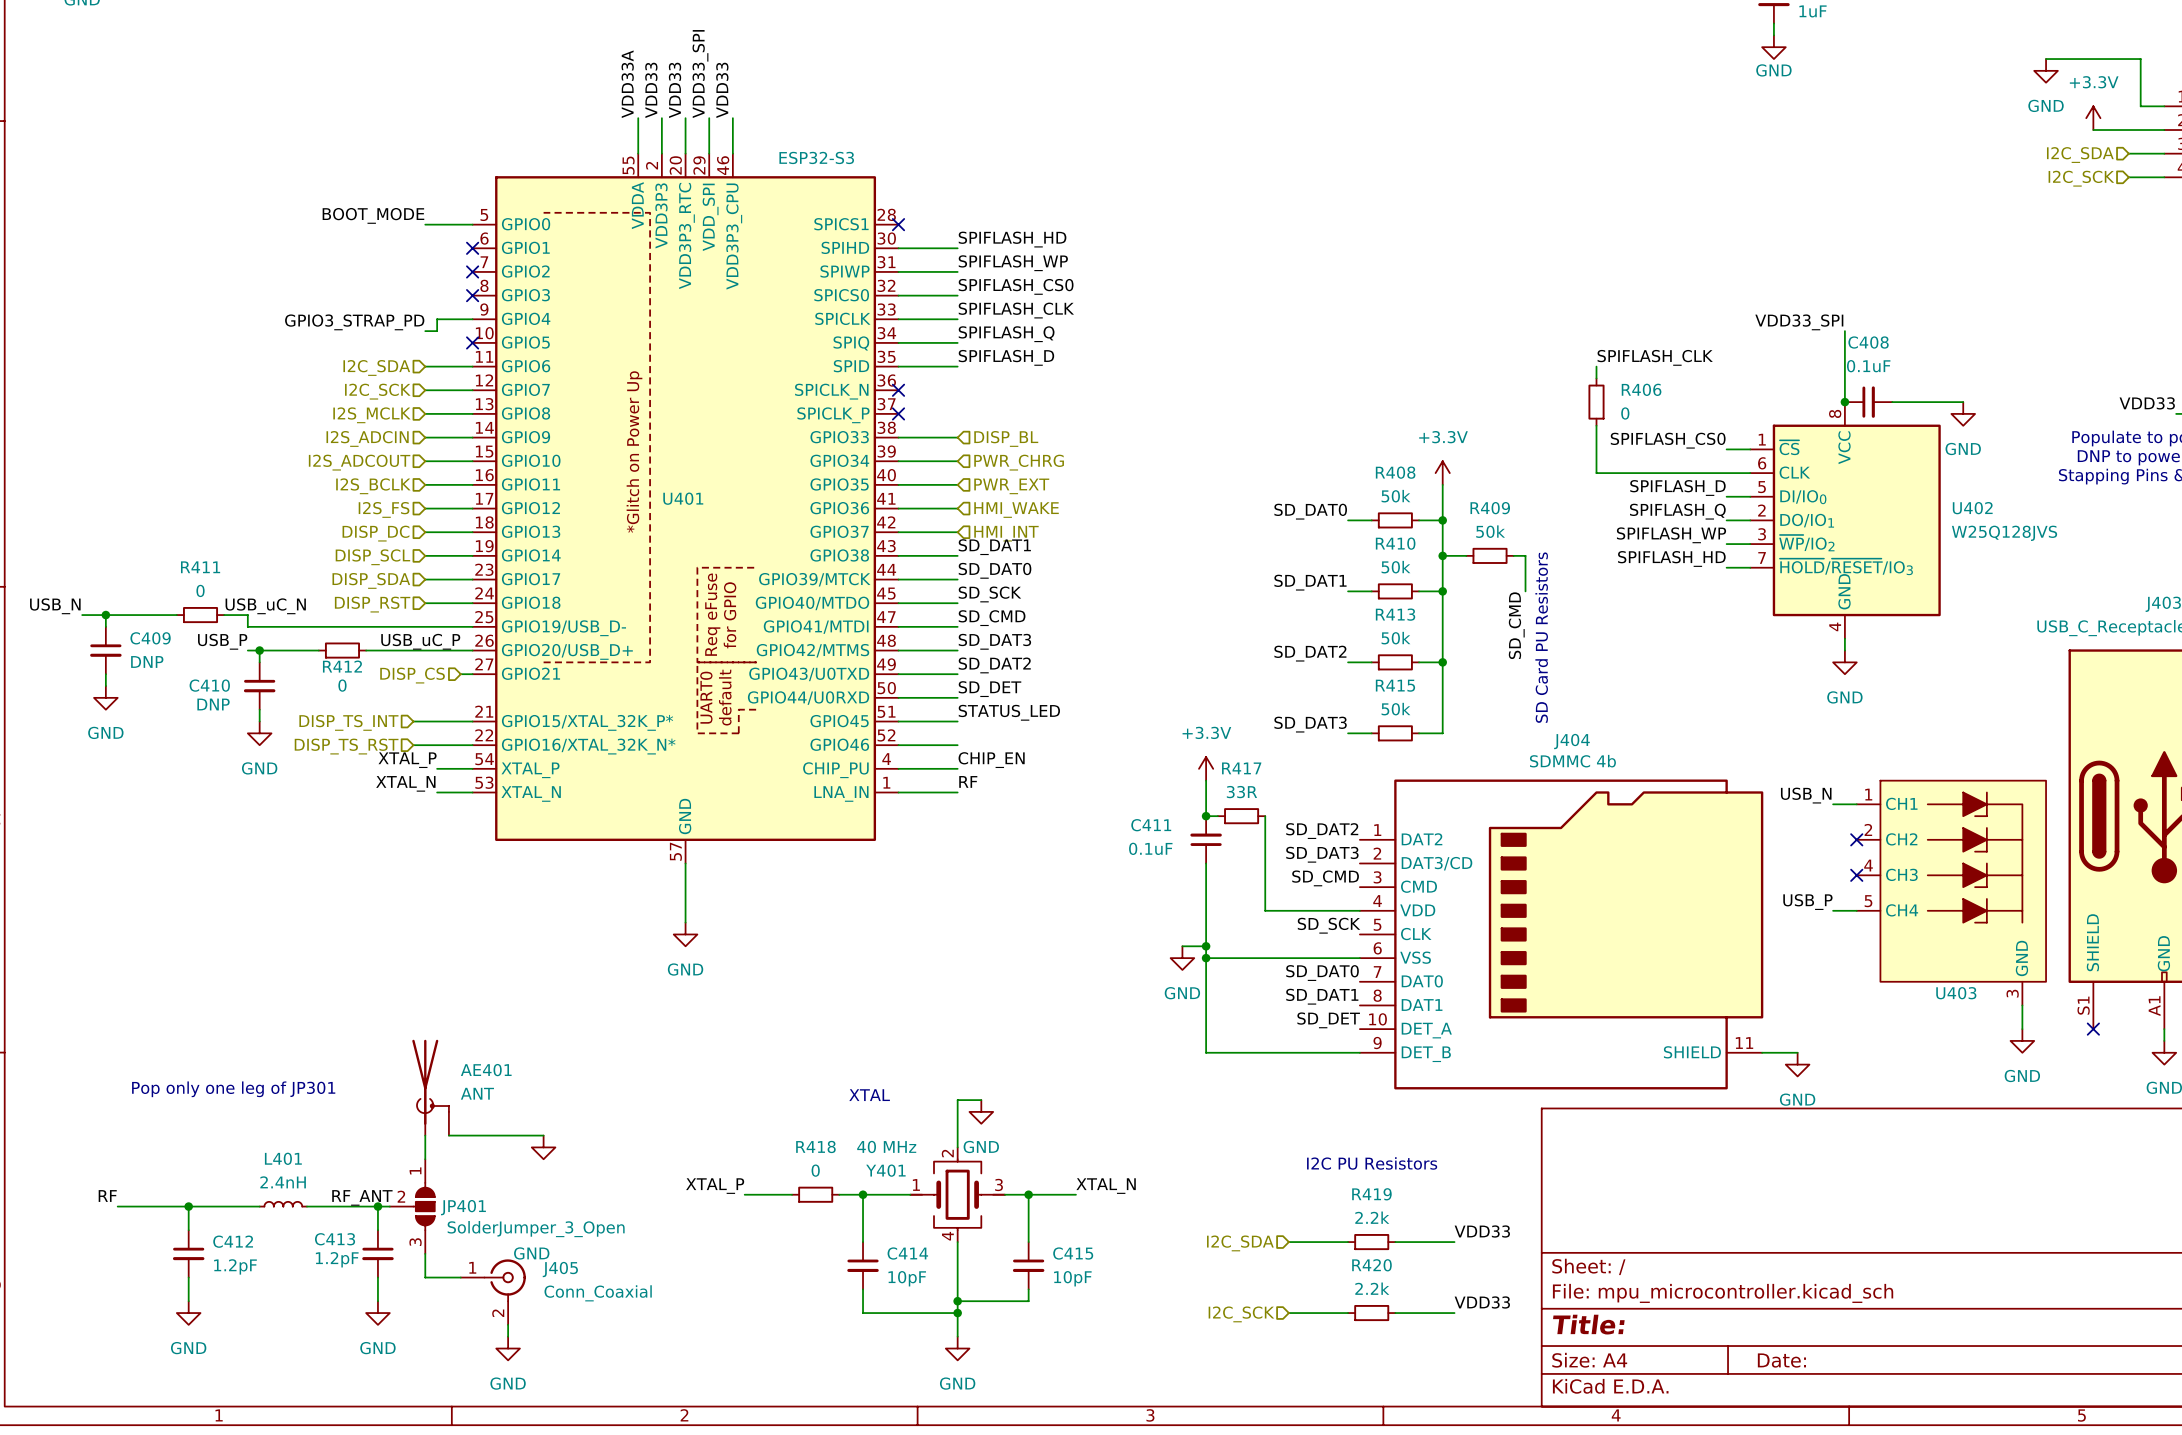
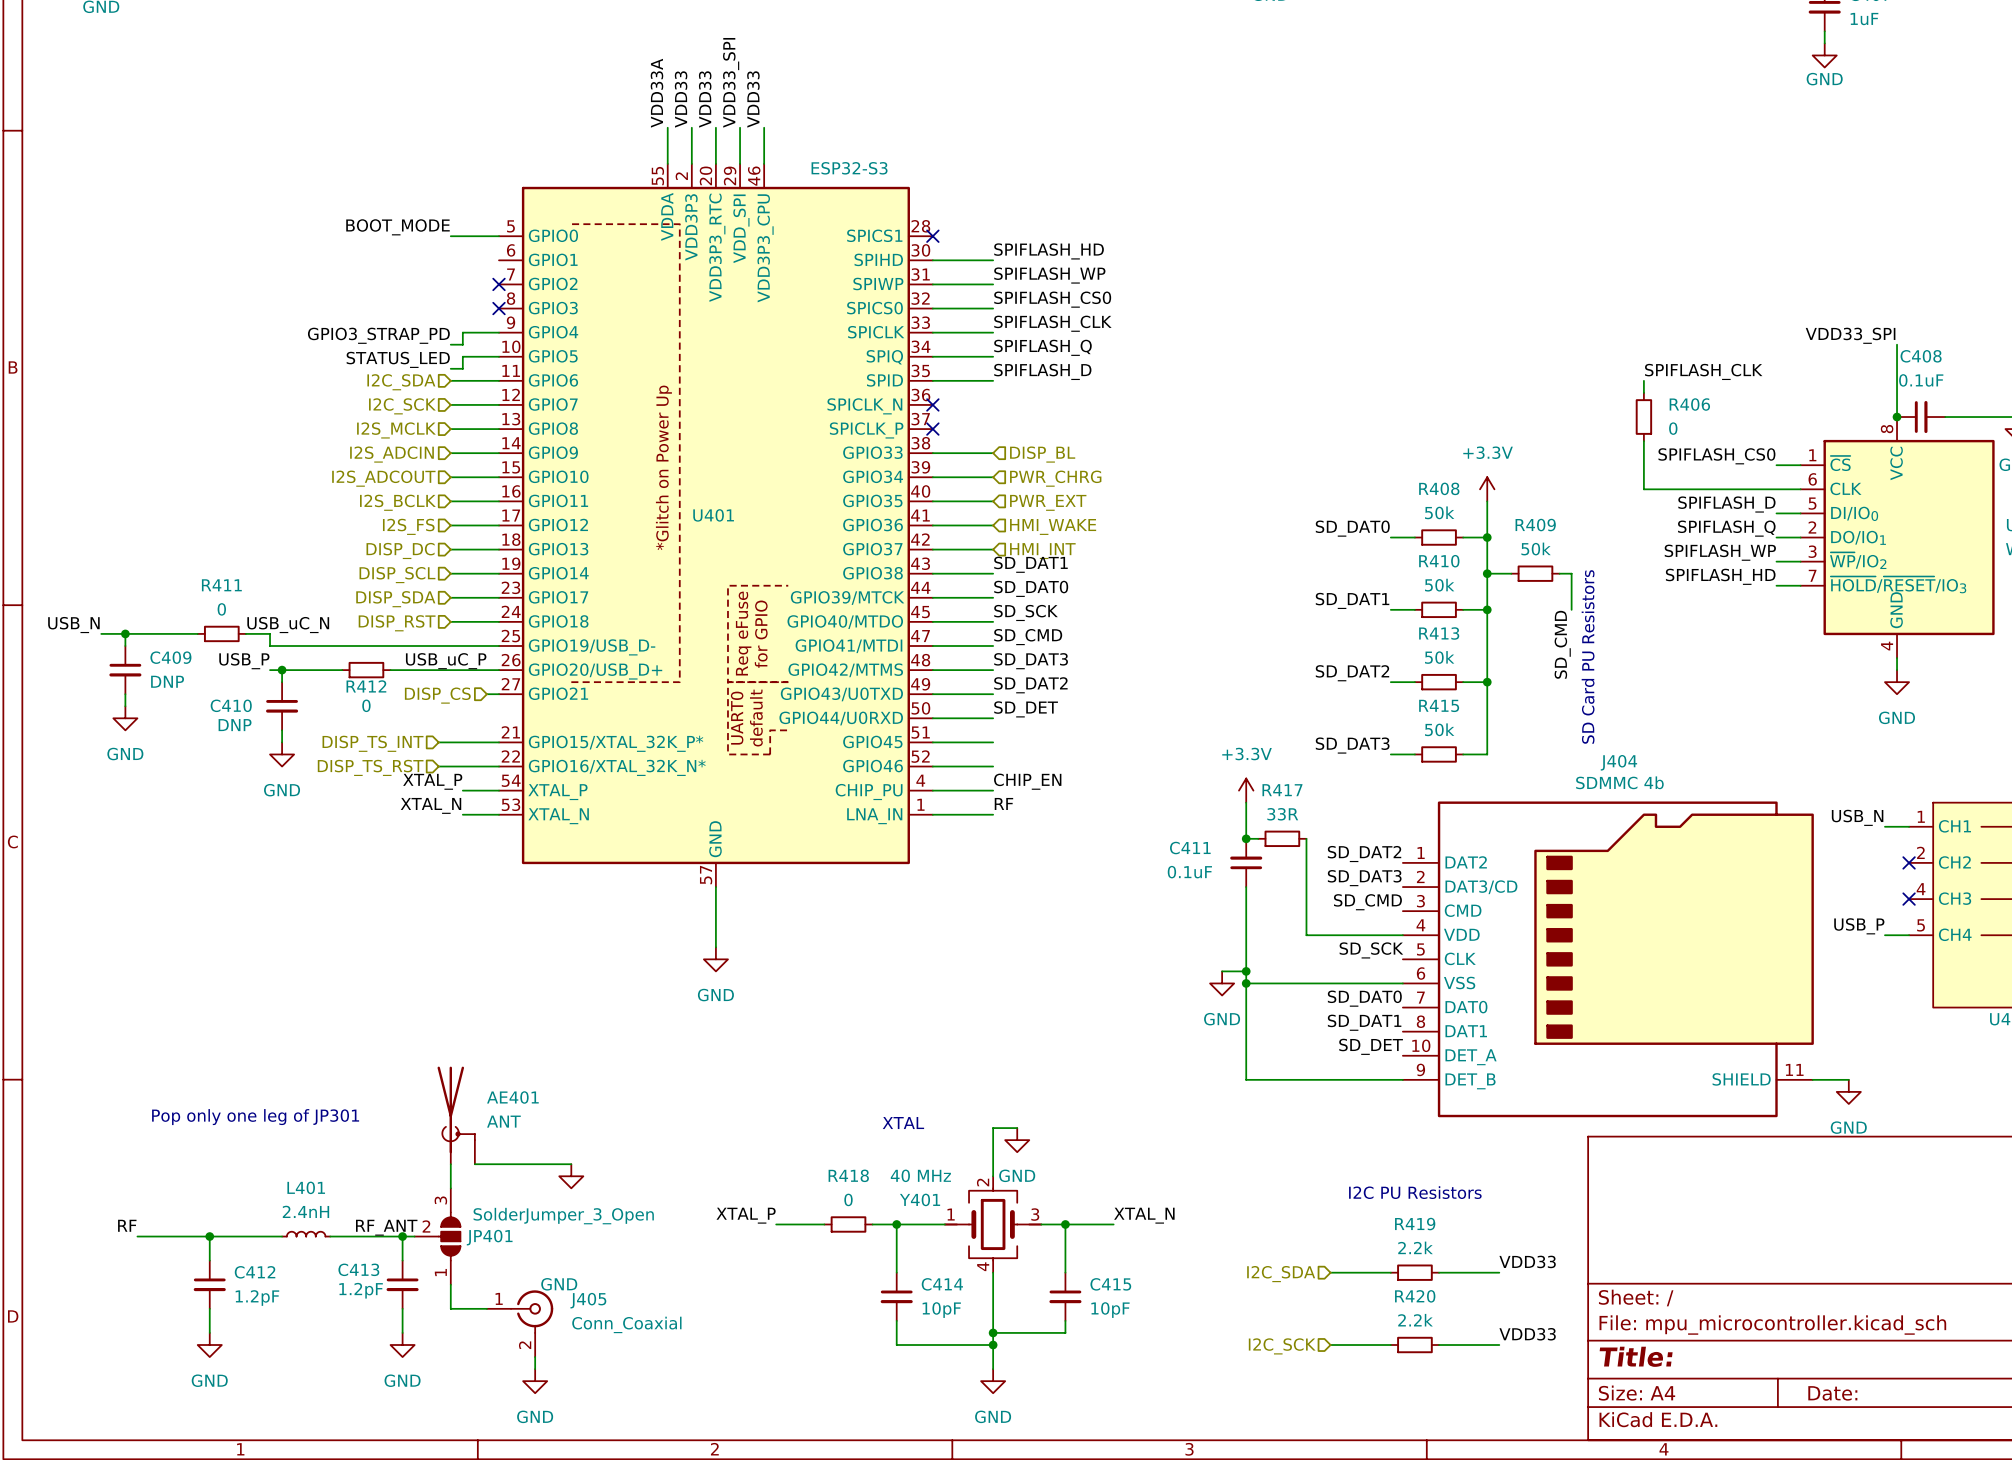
no-connect mark: (472, 248) -> none
wire: none -> (499, 356) (462, 356) (462, 368) (450, 368)
no-connect mark: (472, 342) -> none
label: none -> STATUS_LED (398, 359)
label: STATUS_LED (1009, 712) -> none
JP401 flip: as is (424, 1206) -> up-down (449, 1236)

